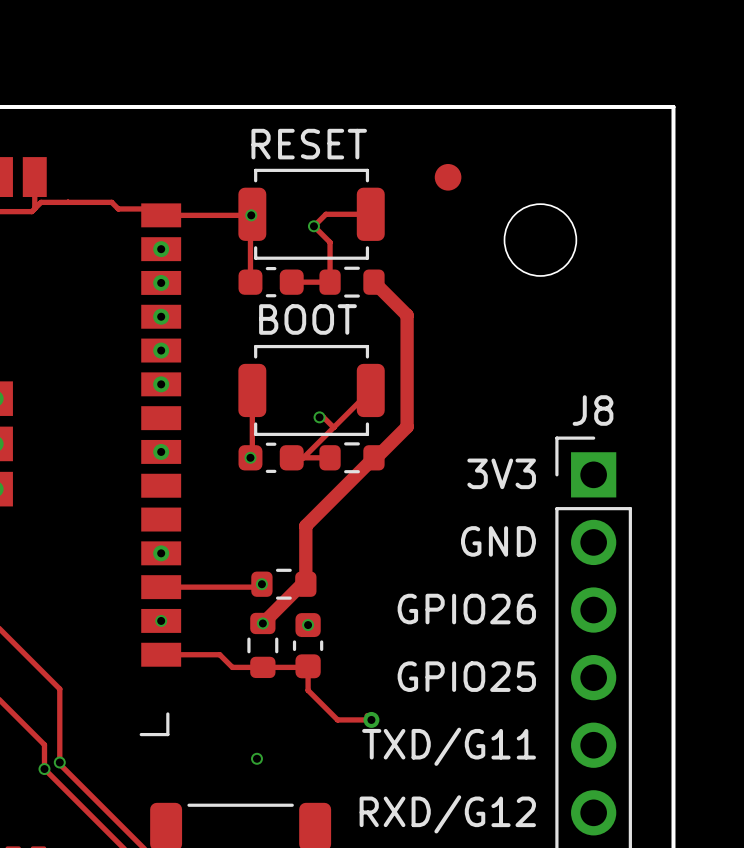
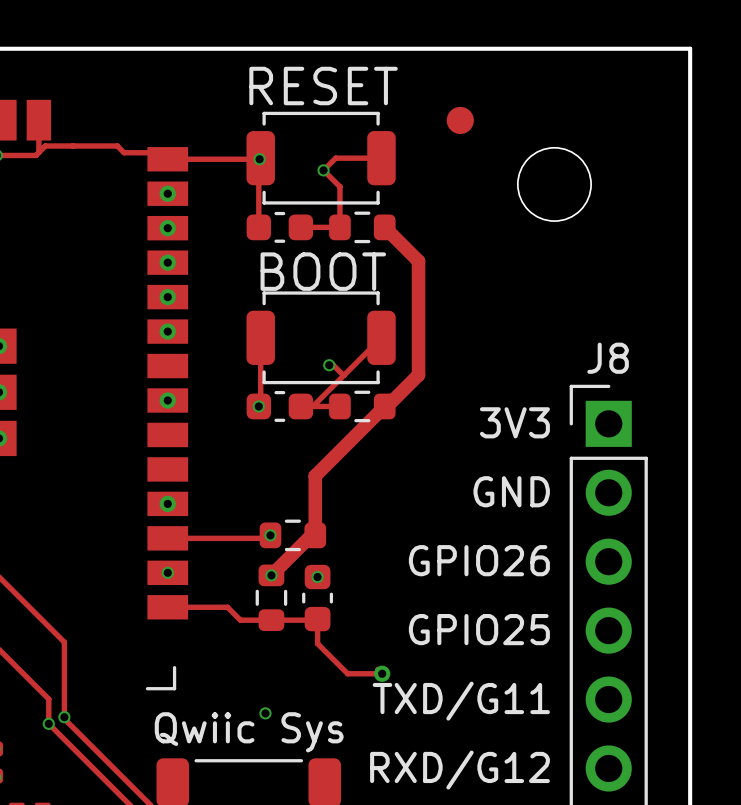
part text: none -> RESET (323, 86)
part value: RESET (309, 144) -> none
part value: BOOT (308, 319) -> none
part text: none -> BOOT (323, 271)
part text: none -> Qwiic Sys (249, 732)

